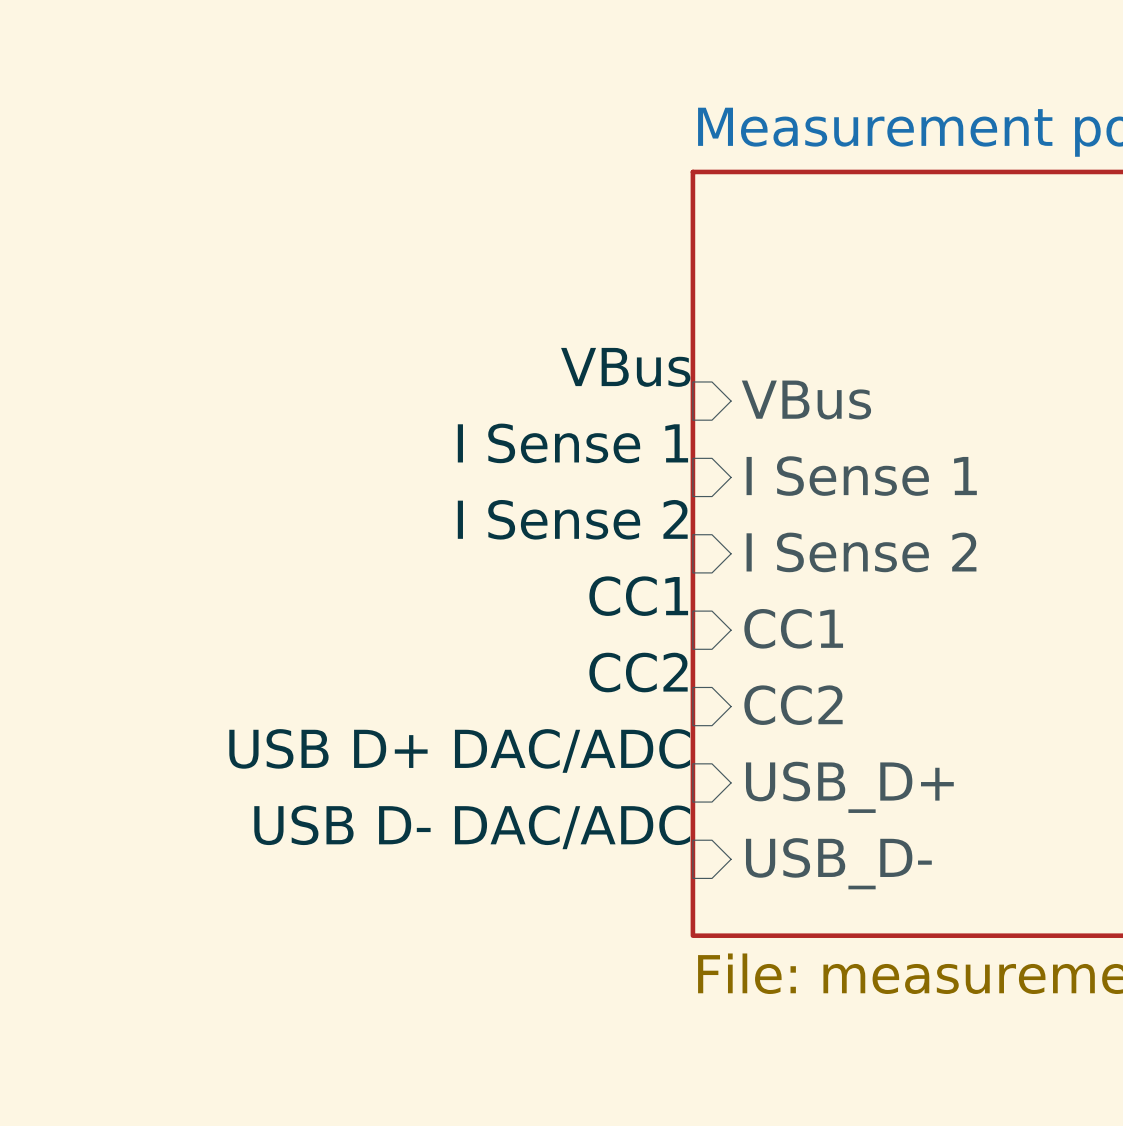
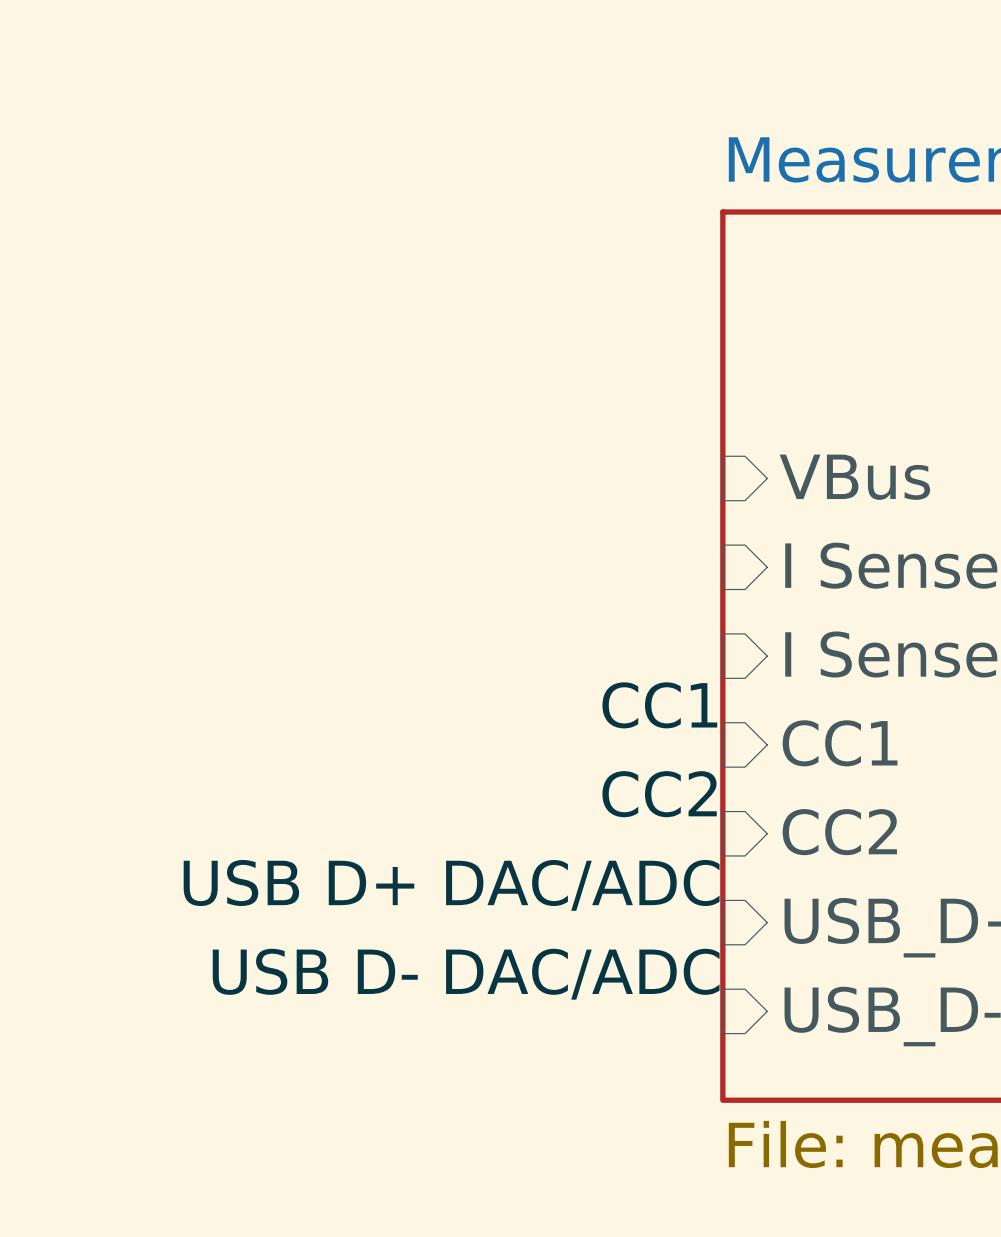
label: VBus (625, 367) -> none
label: I Sense 1 (572, 443) -> none
label: I Sense 2 (572, 519) -> none

